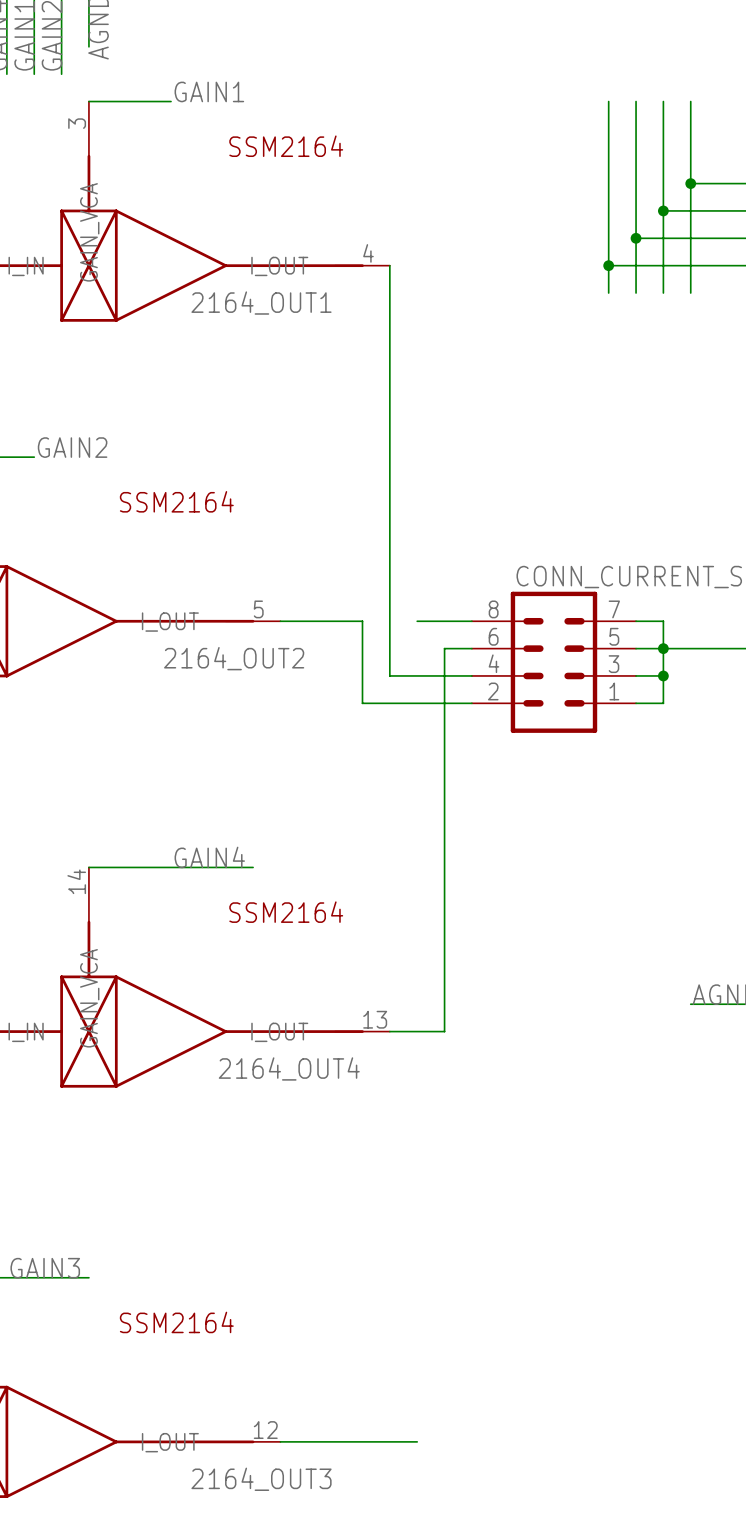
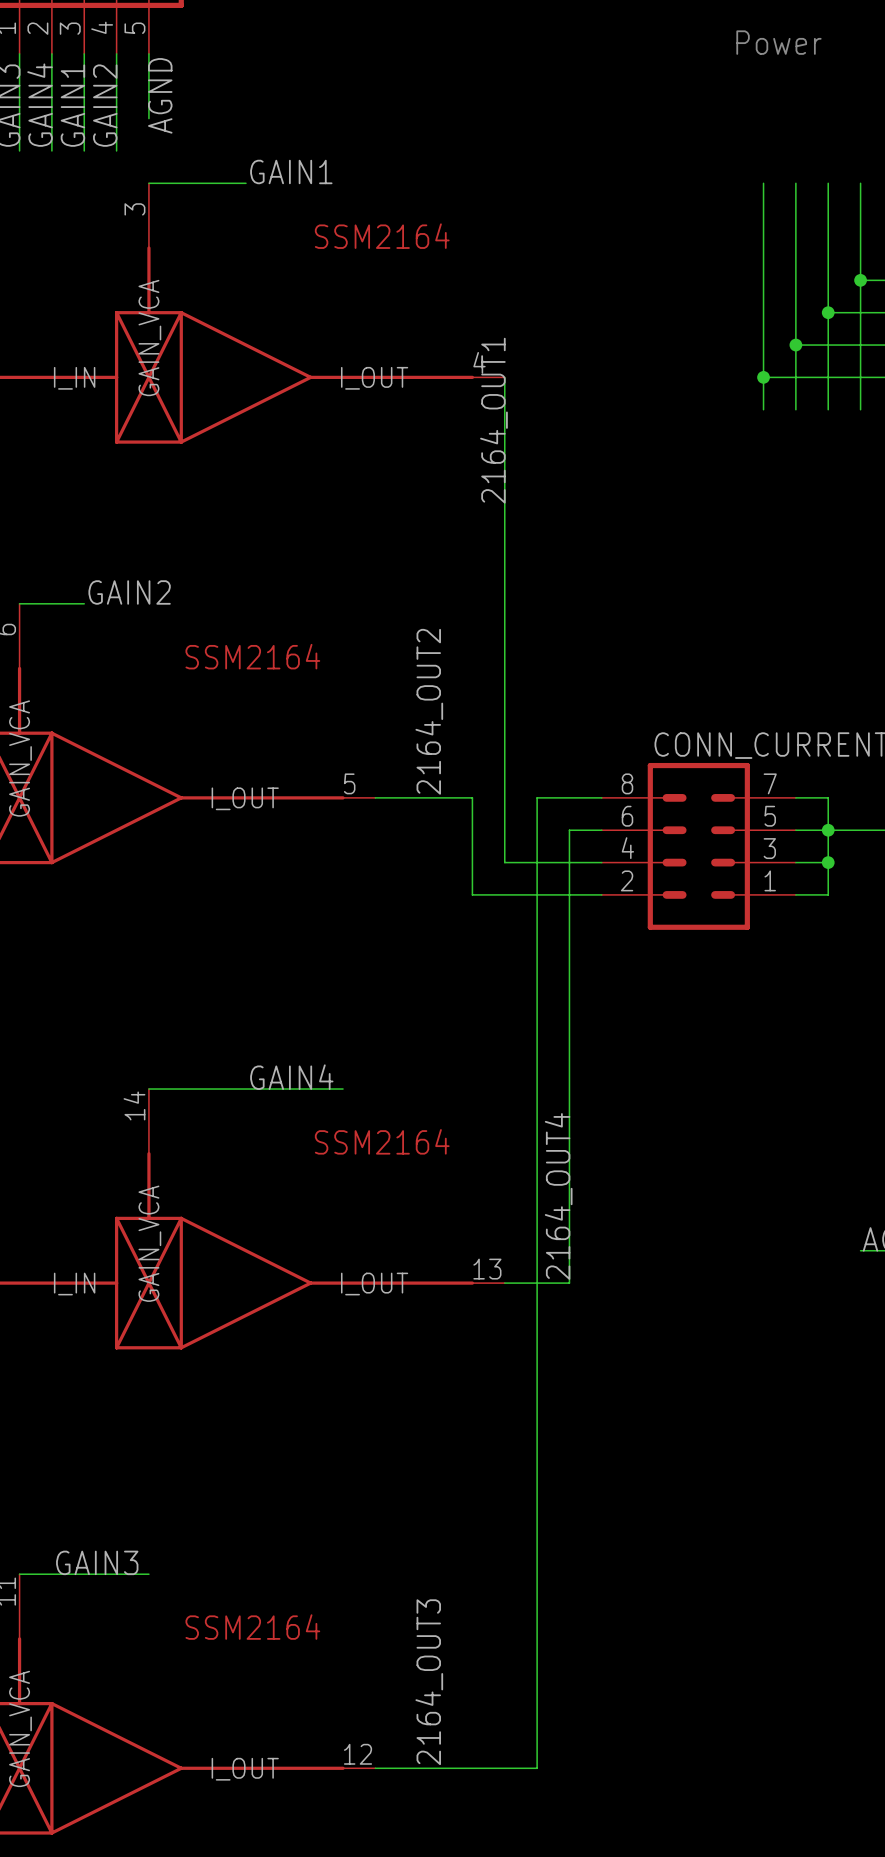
label rotation: 0° (261, 303) -> 90° counterclockwise (493, 420)
wire: none -> (537, 797) (537, 1768)
label rotation: 0° (234, 658) -> 90° counterclockwise (429, 711)
label rotation: 0° (289, 1068) -> 90° counterclockwise (558, 1196)
label position: 2164_OUT4 (289, 1068) -> 2164_OUT4 (558, 1196)
label rotation: 0° (261, 1479) -> 90° counterclockwise (429, 1682)

